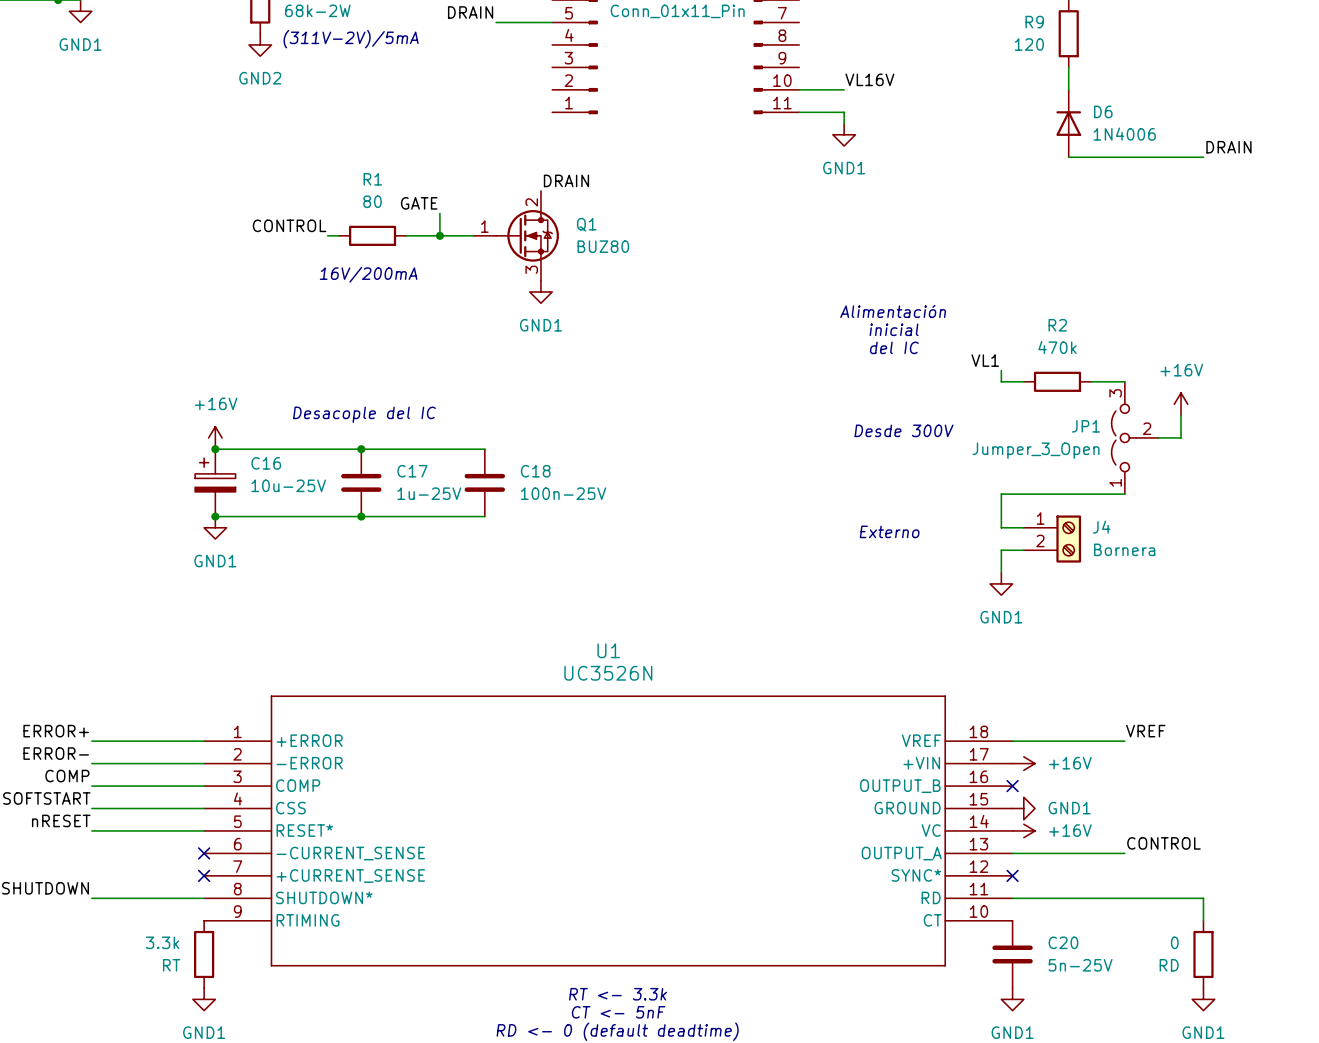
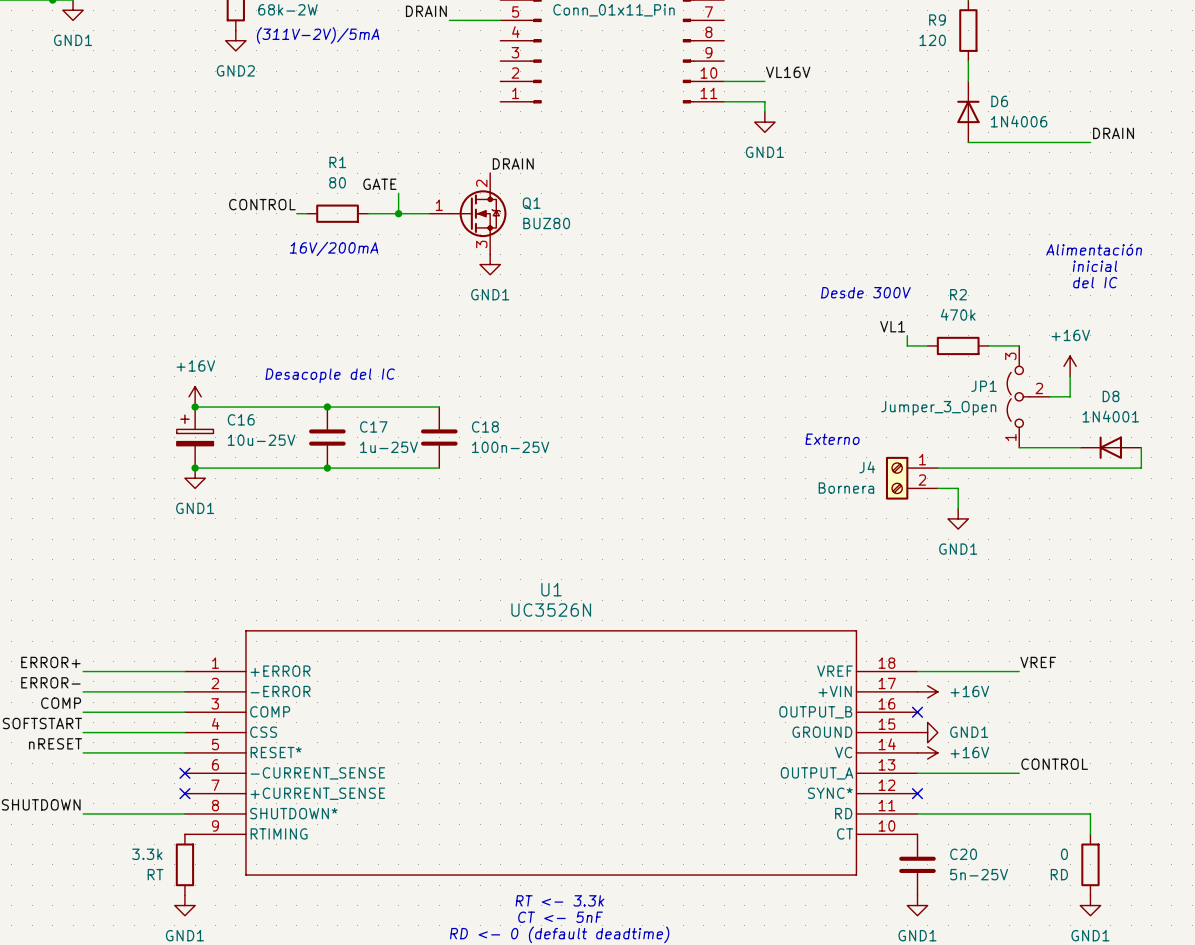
text: none -> Alimentación (1094, 249)
text: none -> inicial (1095, 266)
text: Alimentación (893, 311) -> none
text: none -> del IC (1095, 282)
text: inicial (894, 329) -> none
text: del IC (894, 347) -> none
text position: Desde 300V (904, 430) -> Desde 300V (865, 292)
wire: (1124, 494) (1001, 494) (1001, 527) (1023, 527) -> (1019, 447) (1080, 447)
D8: none -> 1N4001 (1110, 447)
wire: none -> (1141, 447) (1141, 468) (937, 468)
text position: Externo (889, 531) -> Externo (832, 439)
wire: none -> (937, 488) (958, 488) (958, 508)
J4 position: (1052, 539) -> (911, 478)
J4 flip: as is (1068, 539) -> left-right (897, 478)
wire: (1023, 550) (1001, 550) (1001, 572) -> none
power symbol position: GND1 (1001, 583) -> GND1 (958, 518)

